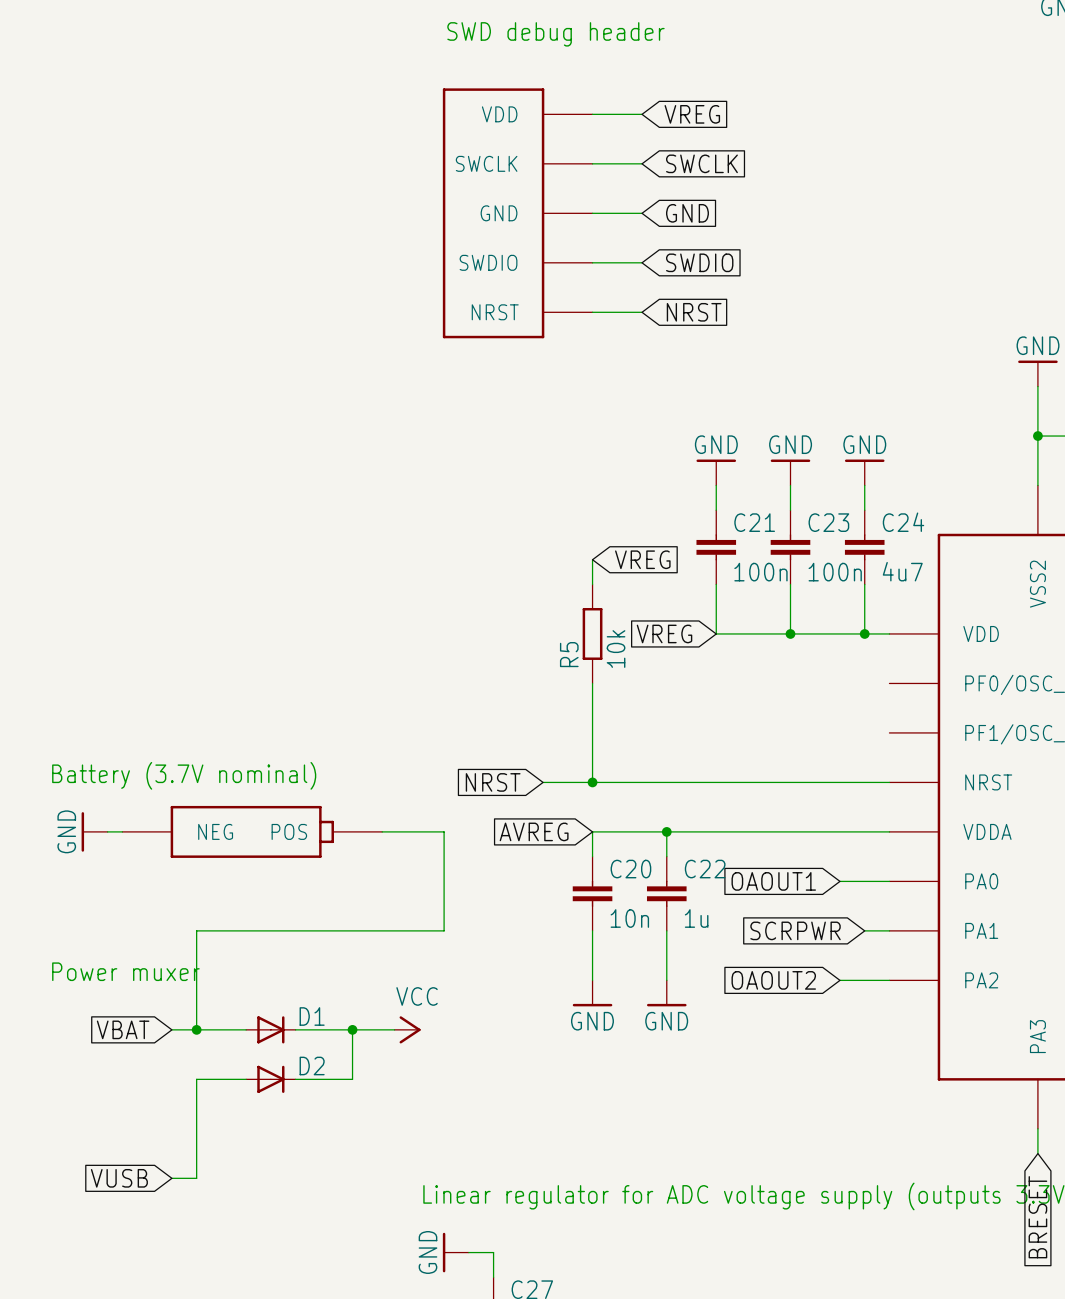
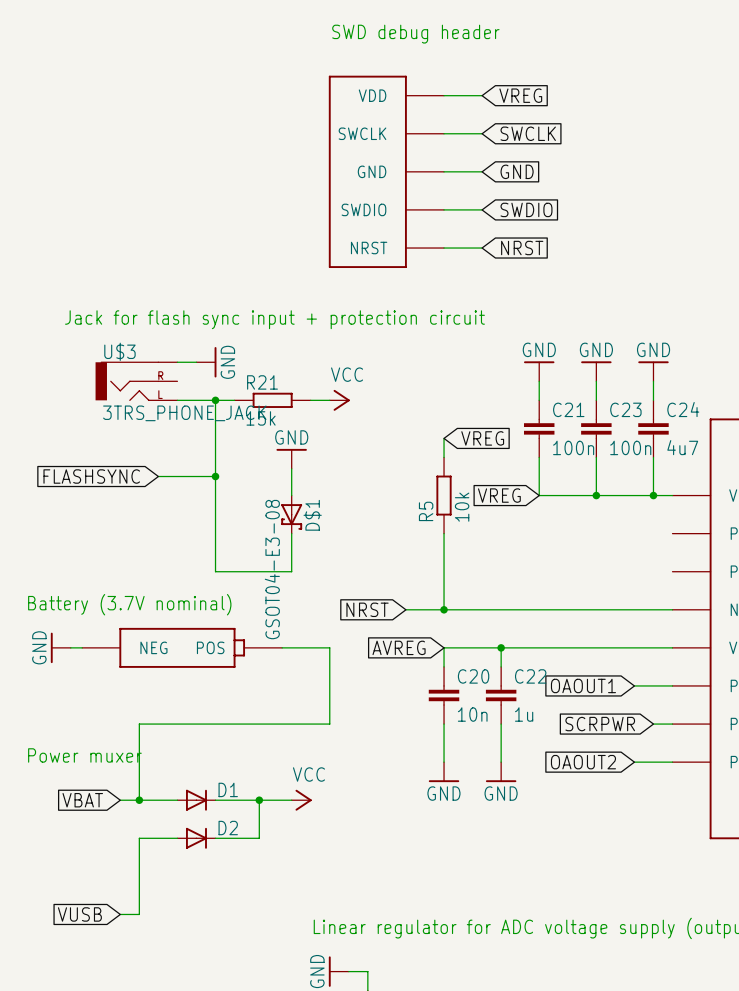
text: none -> Jack for flash sync input + protection circuit (274, 319)
wire: none -> (177, 362) (196, 362)
power symbol: none -> GND (206, 362)
U$3: none -> 3TRS_PHONE_JACK (136, 381)
wire: none -> (177, 400) (234, 400)
wire: none -> (215, 400) (215, 571) (291, 571) (291, 533)
junction: none -> (215, 400)
R21: none -> 15k (272, 400)
wire: none -> (310, 400) (329, 400)
power symbol: none -> VCC (339, 400)
power symbol: none -> GND (291, 458)
wire: none -> (291, 468) (291, 495)
global label: none -> FLASHSYNC (91, 476)
wire: none -> (158, 476) (215, 476)
junction: none -> (215, 476)
D$1: none -> GSOT04-E3-08 (291, 514)

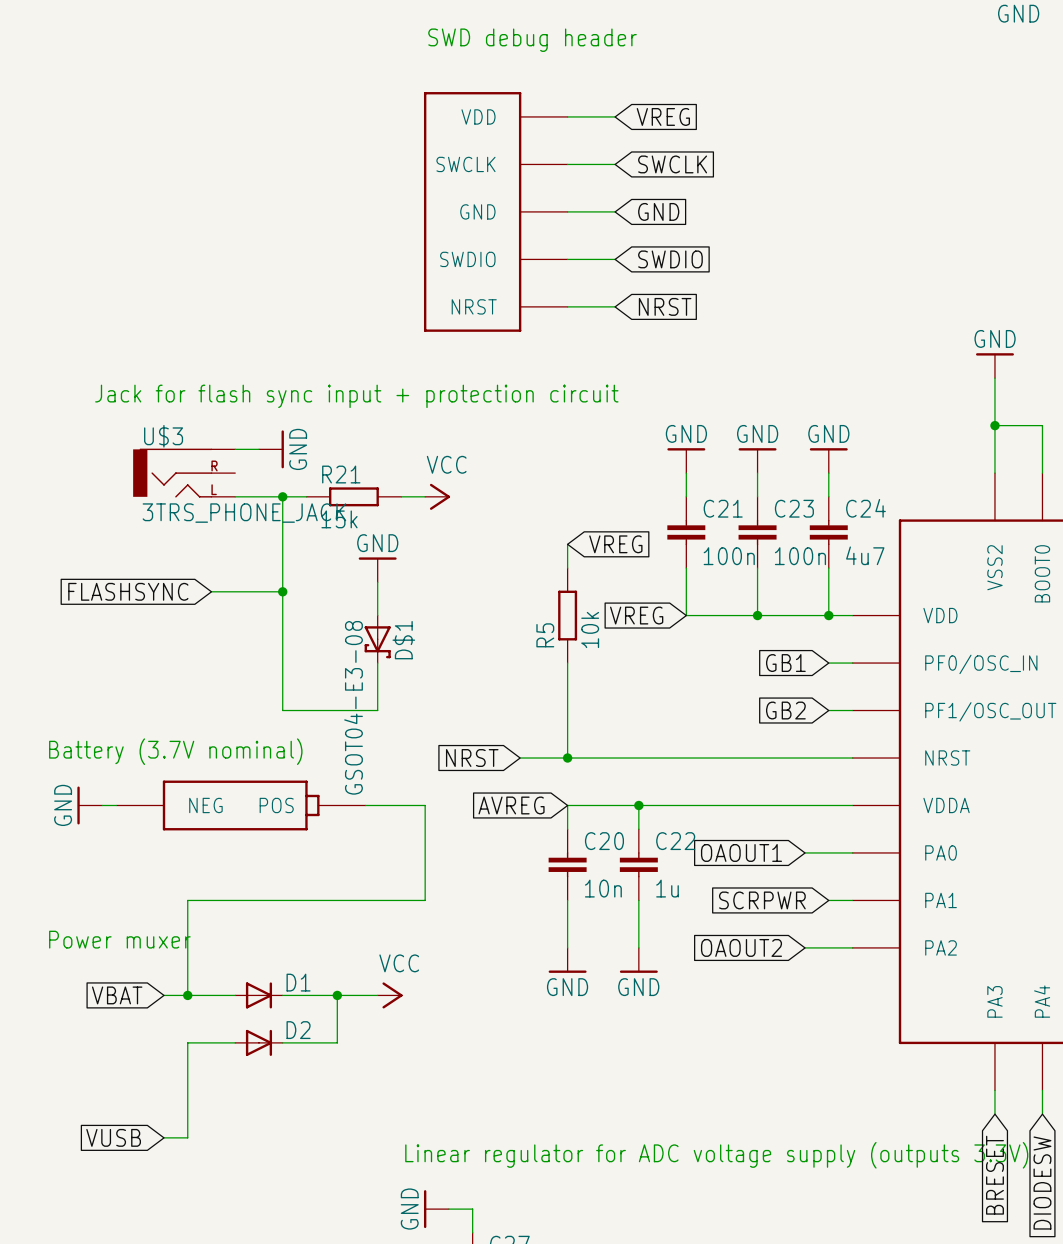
global label: none -> GB1 (785, 663)
wire: none -> (828, 663) (852, 663)
global label: none -> GB2 (785, 710)
wire: none -> (828, 710) (852, 710)

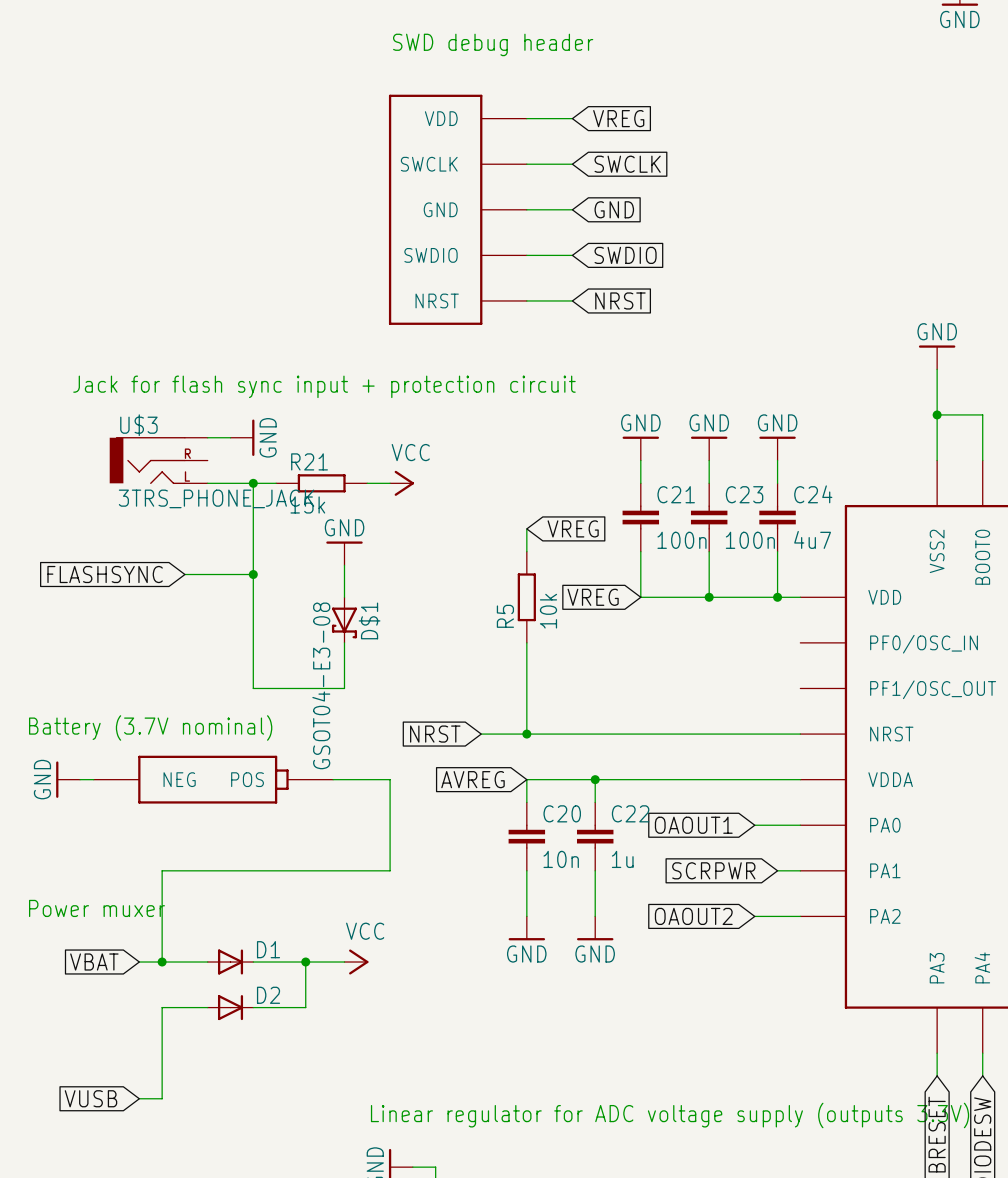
global label: GB1 (785, 663) -> none
wire: (828, 663) (852, 663) -> none
global label: GB2 (785, 710) -> none
wire: (828, 710) (852, 710) -> none

